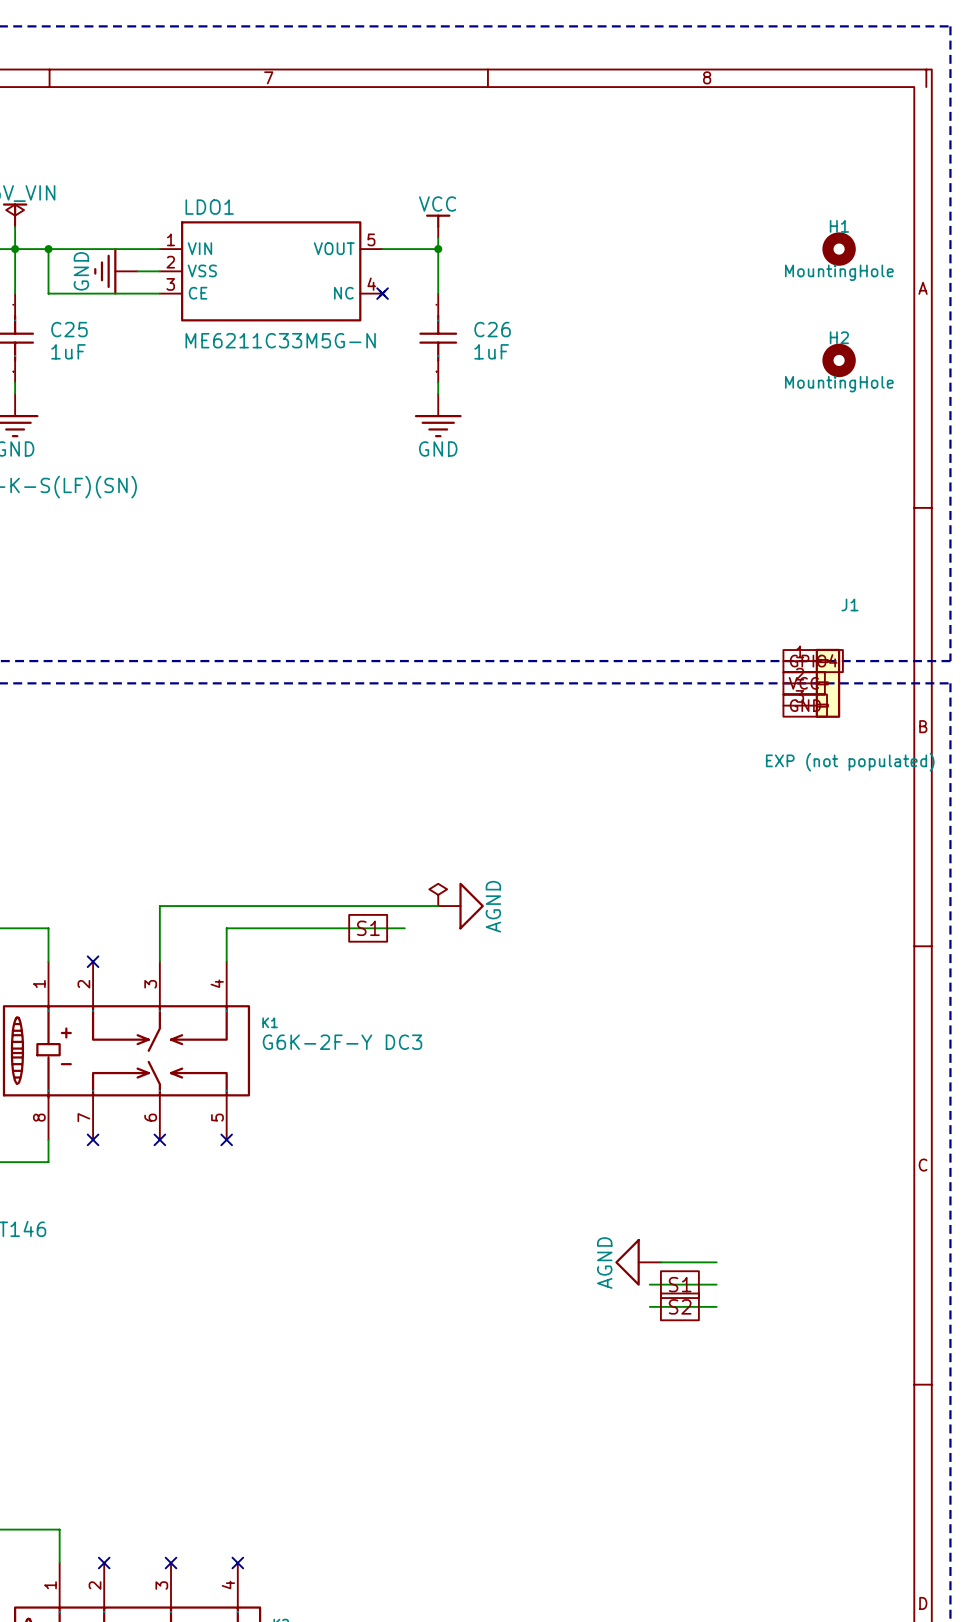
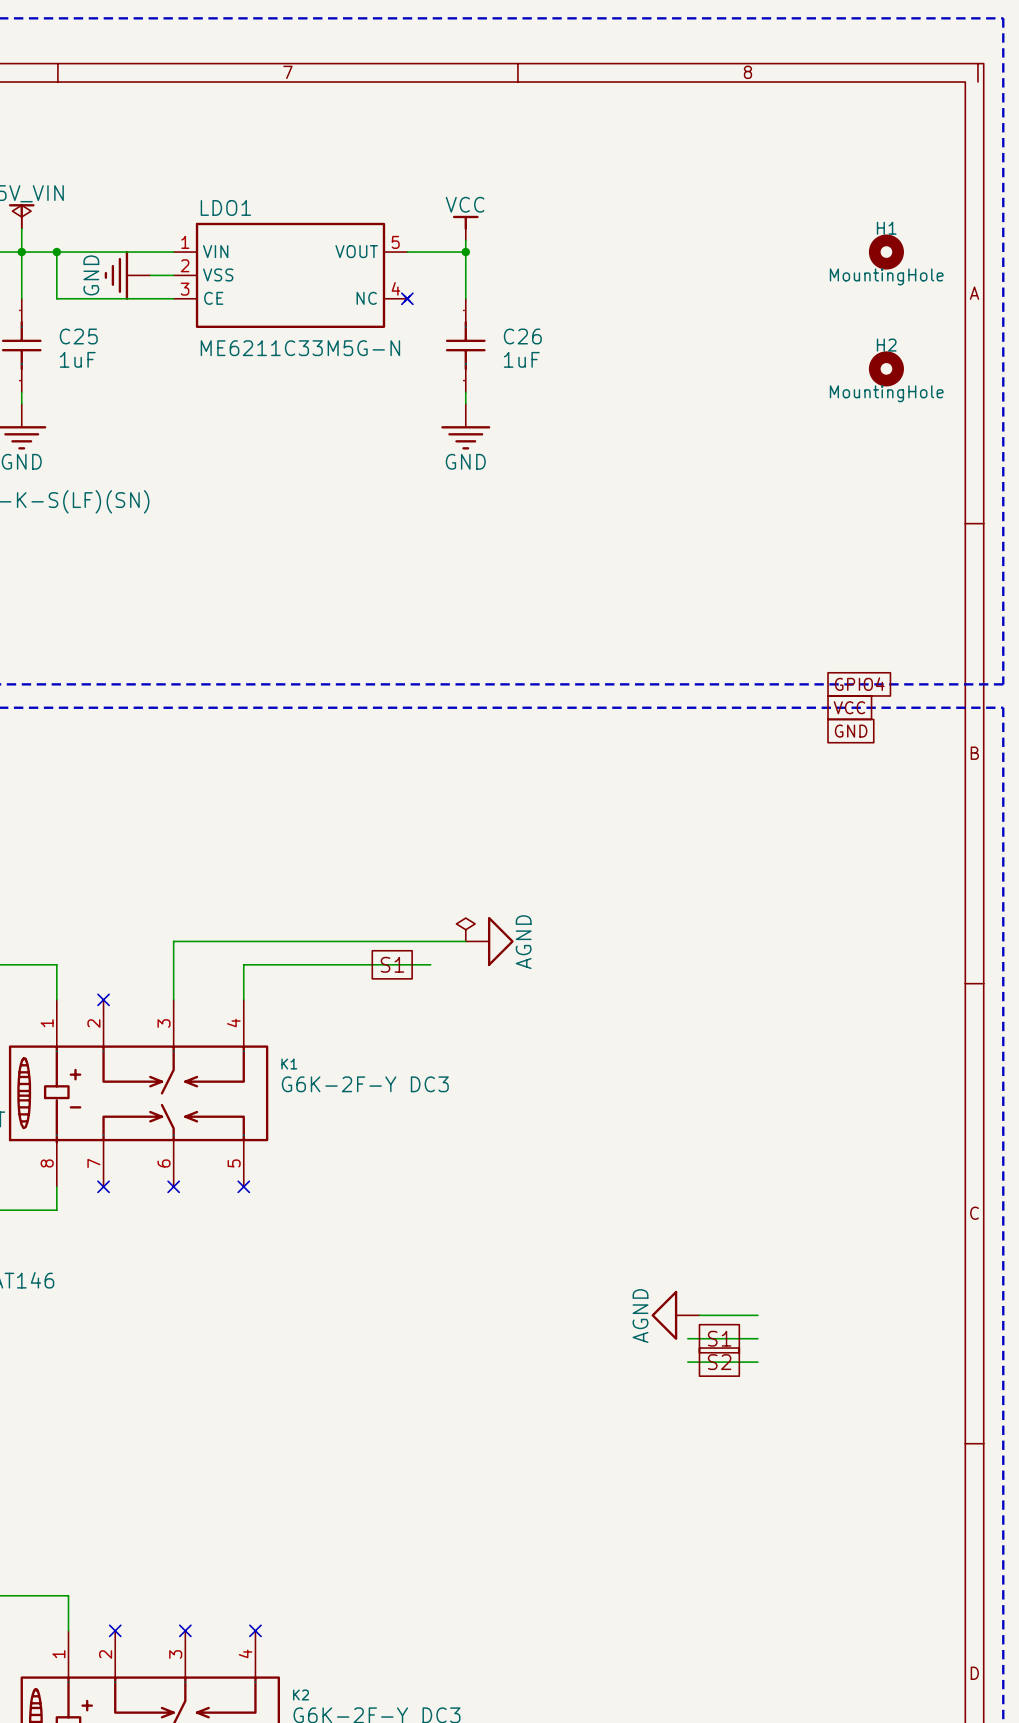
J1: EXP (not populated) (811, 683) -> none

